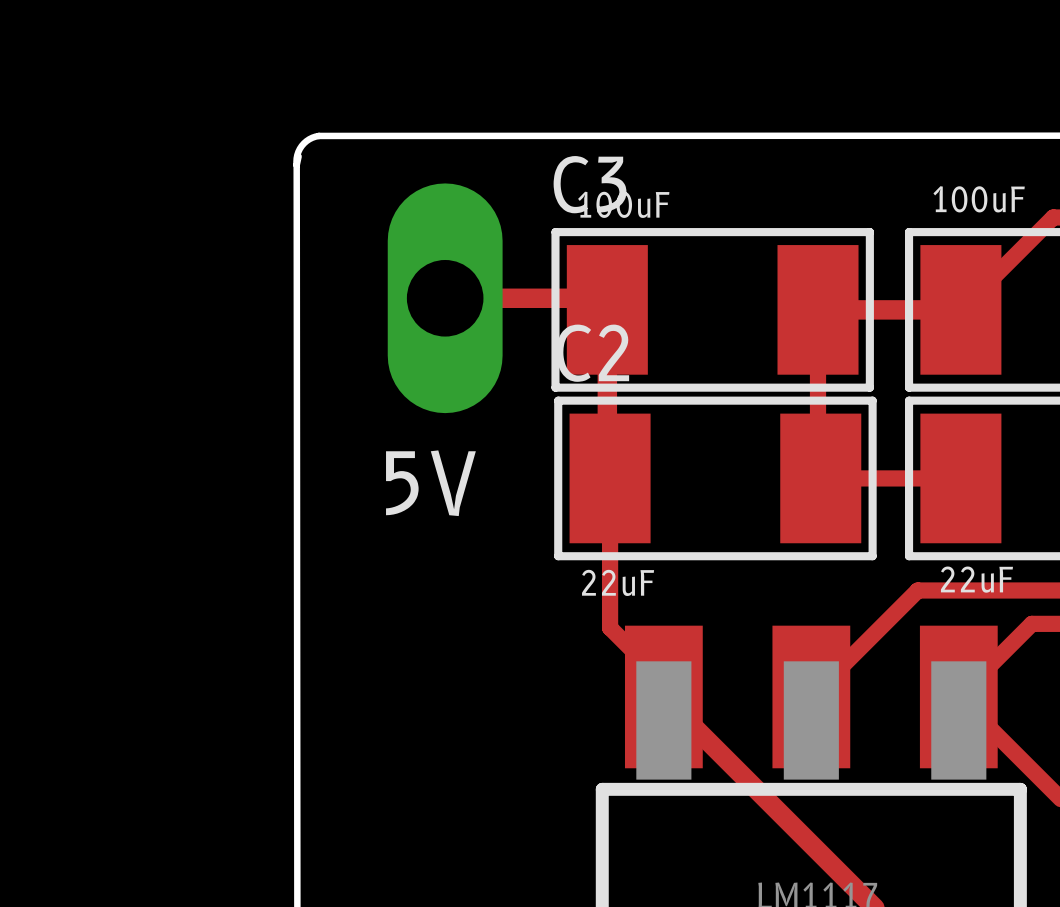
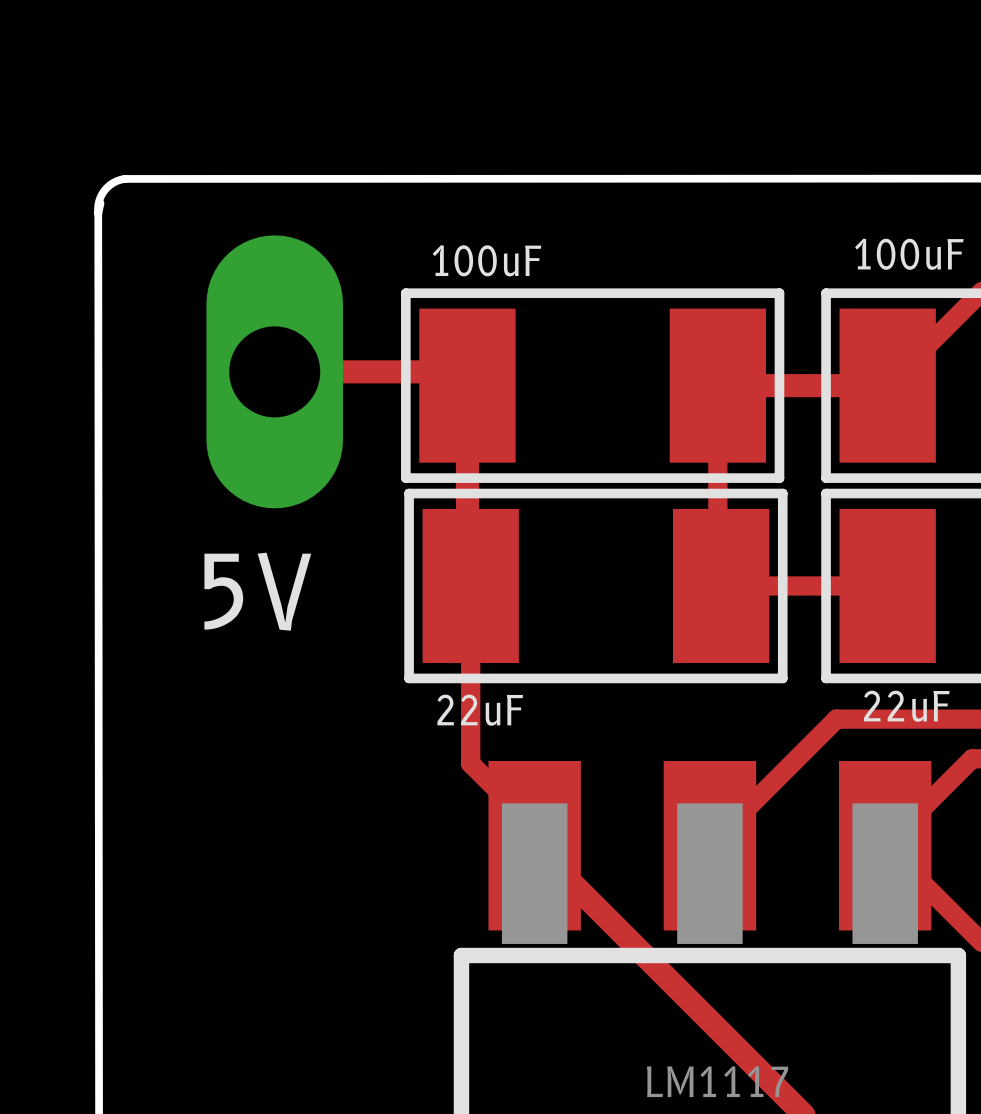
C3 name: C3 (590, 184) -> none
C2 name: C2 (592, 353) -> none

